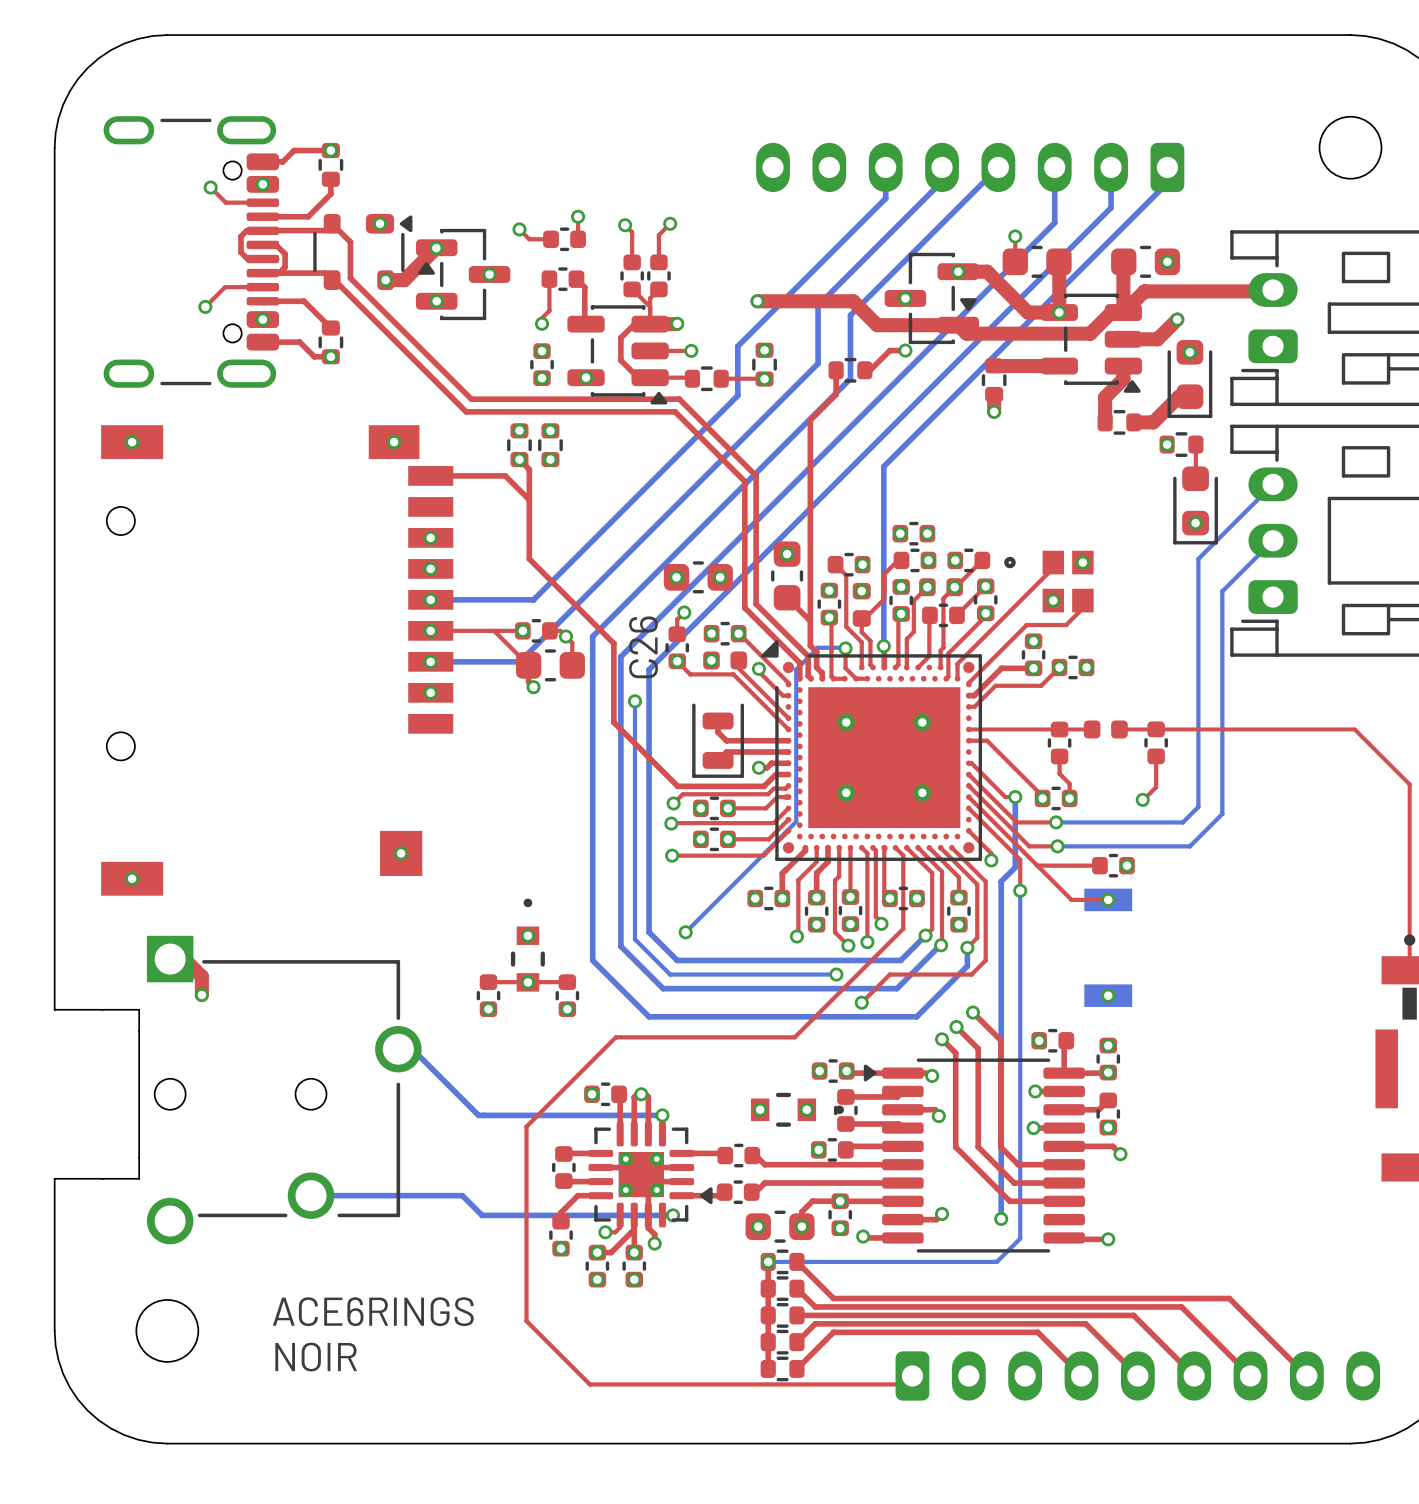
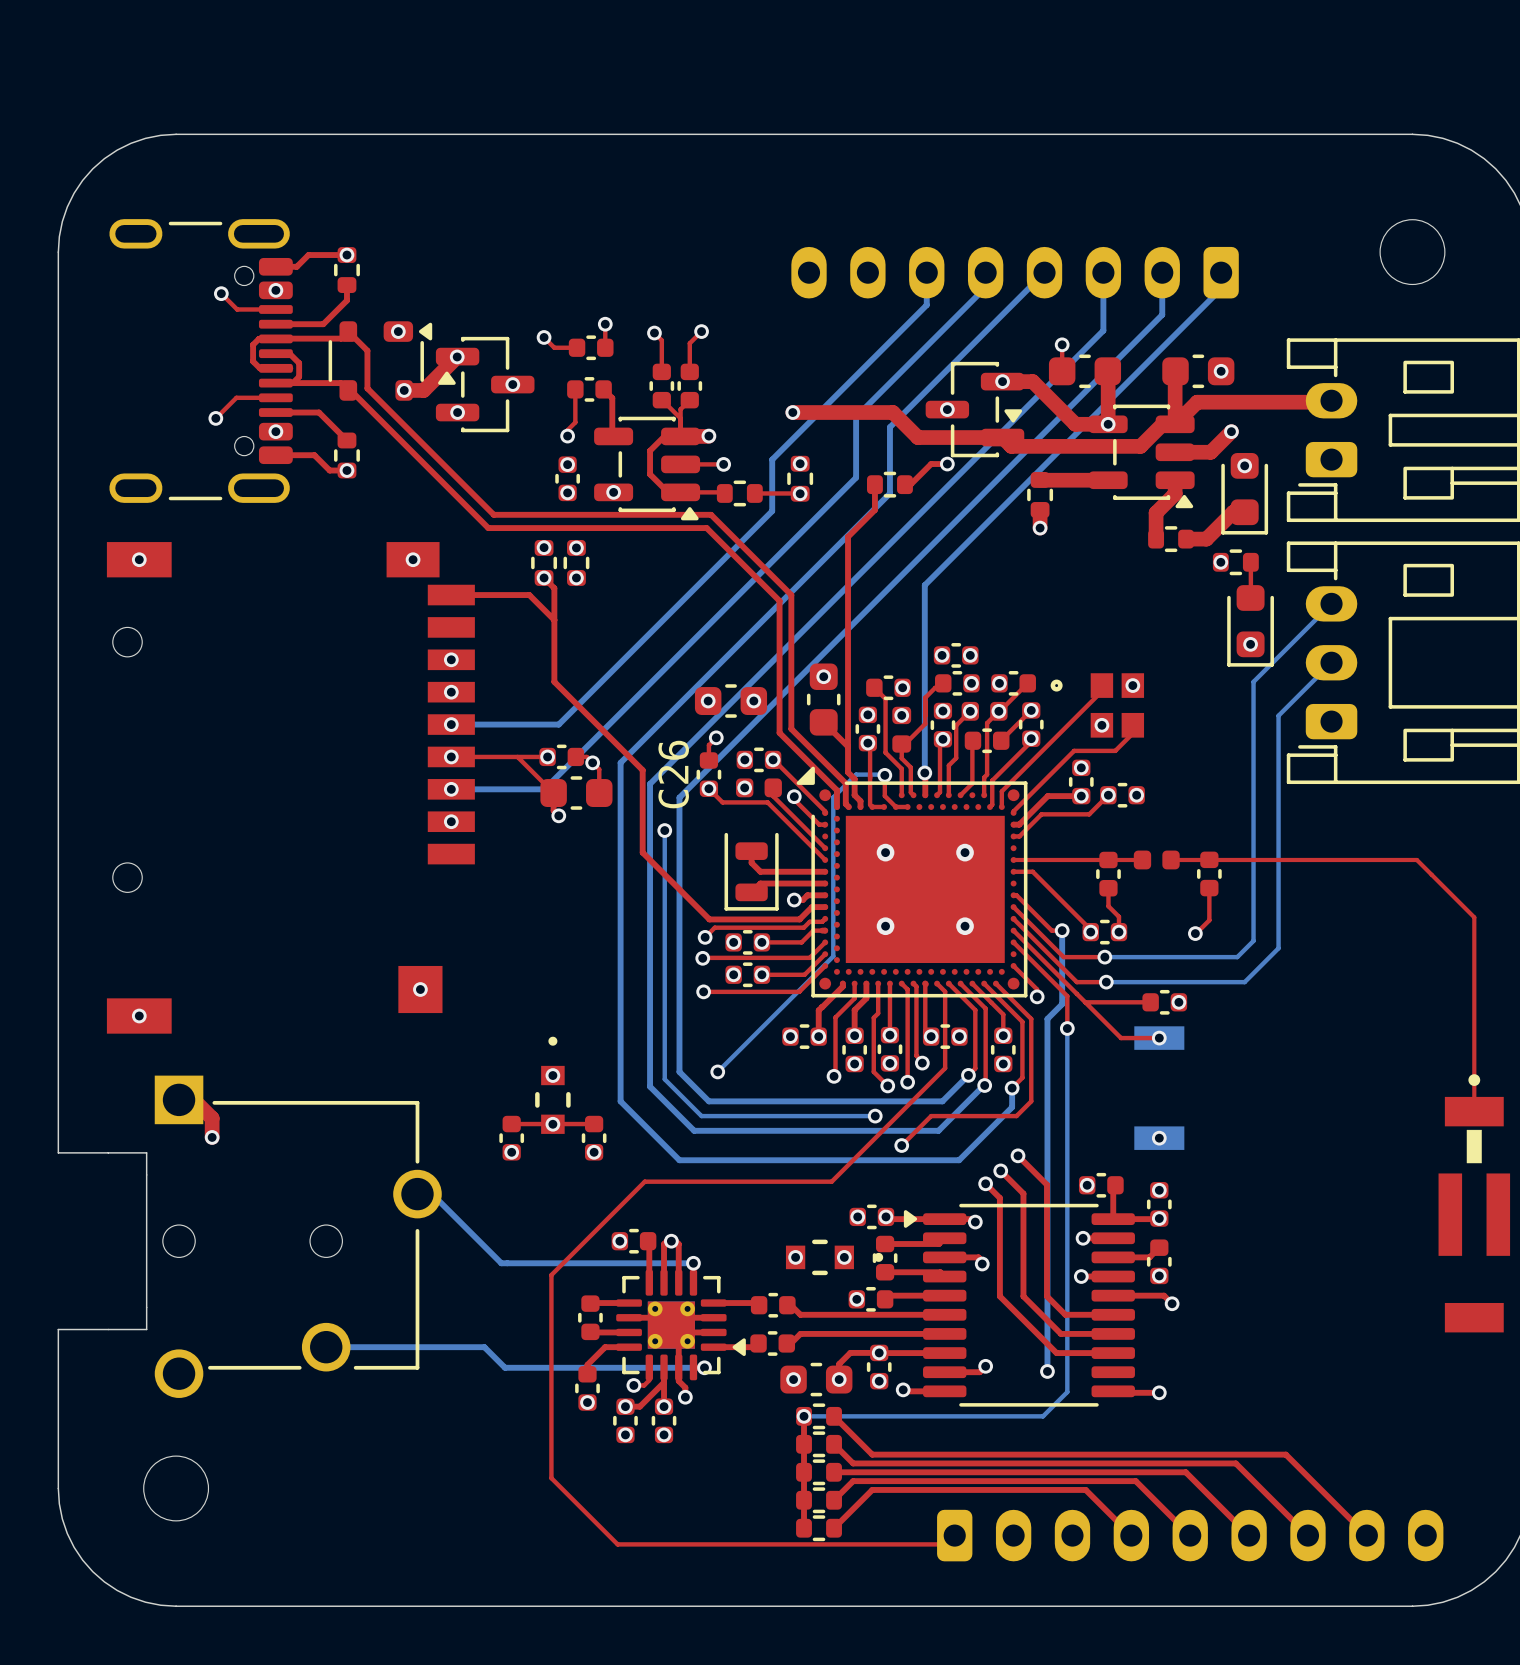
text: ACE6RINGS (373, 1311) -> none
text: NOIR (316, 1357) -> none

